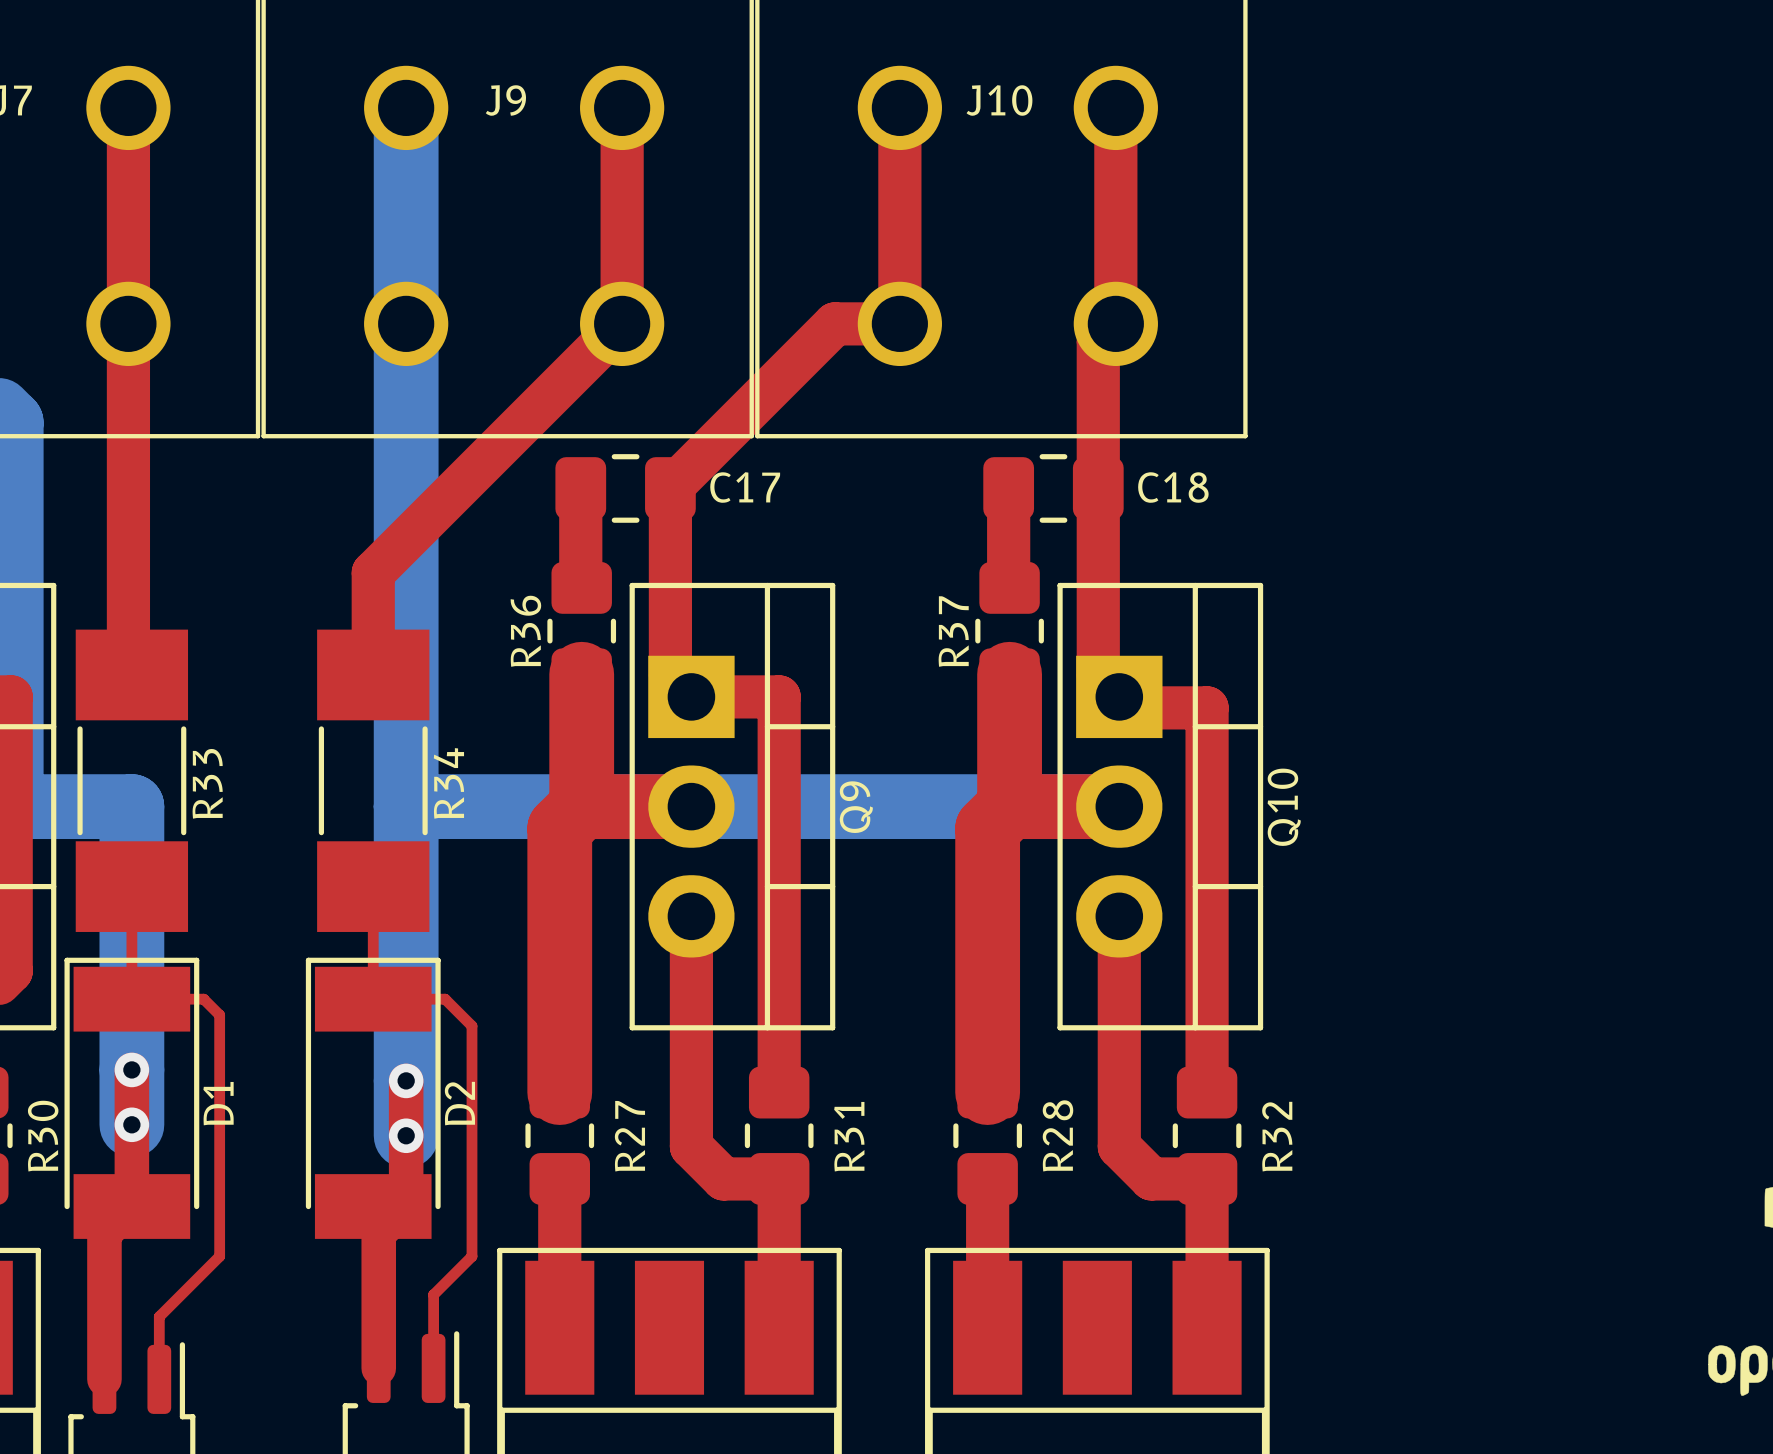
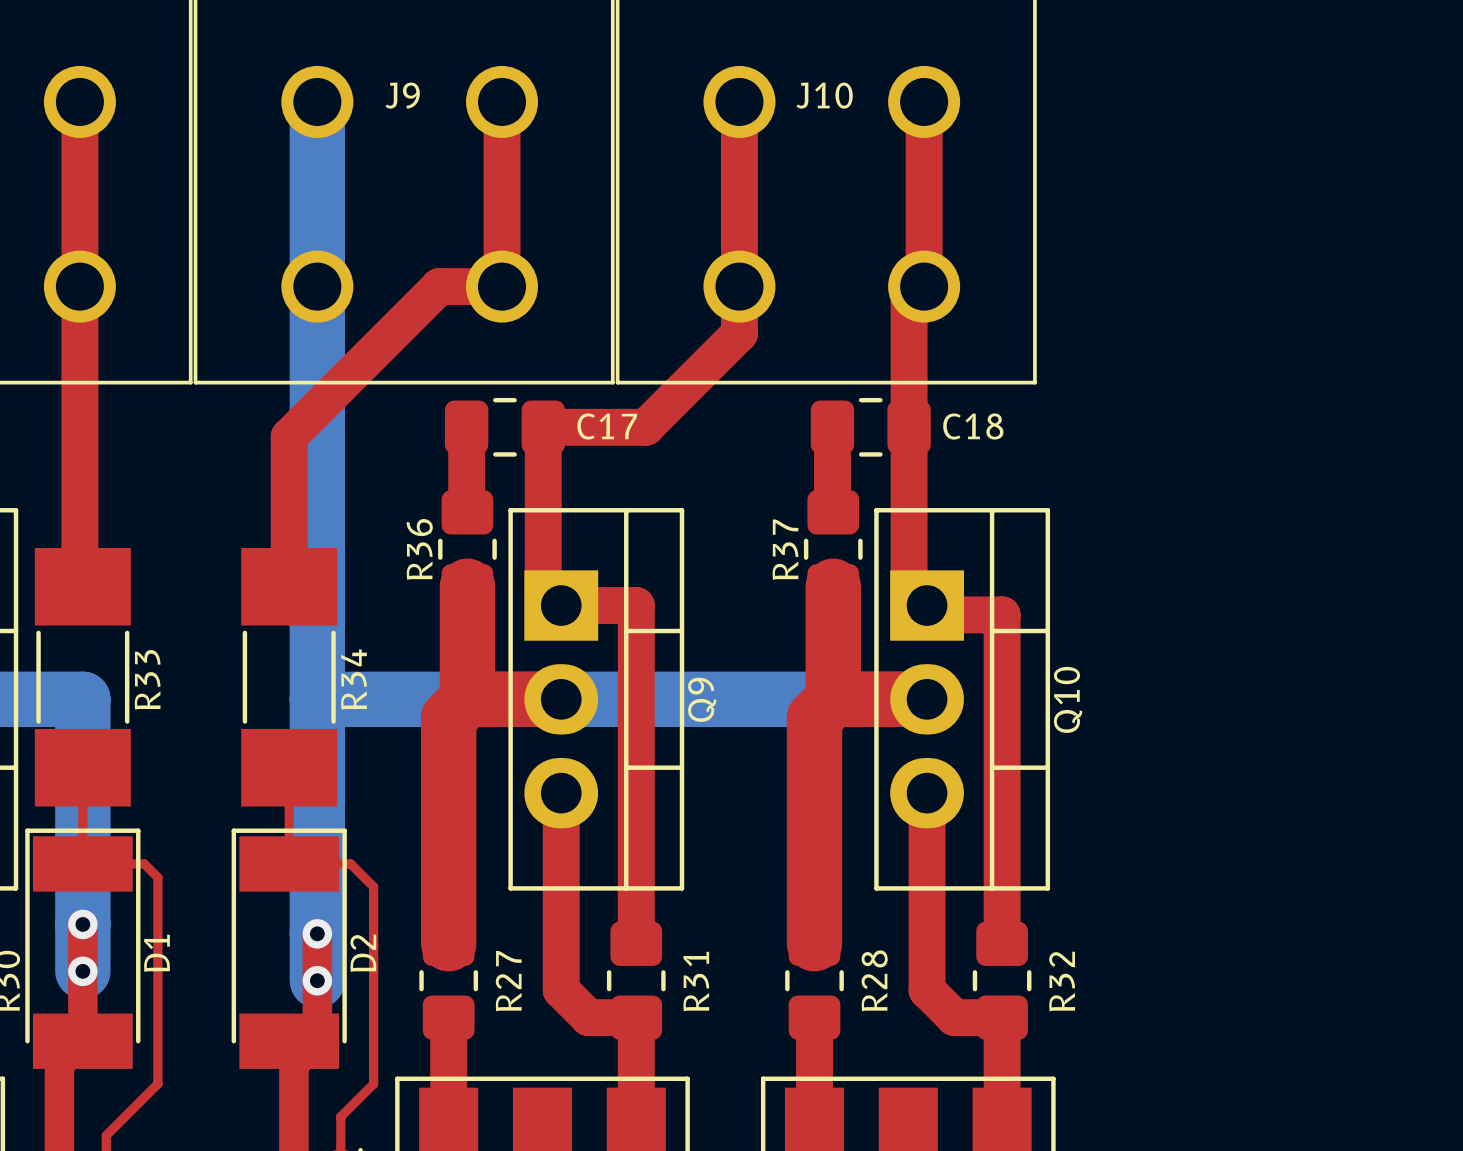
top track: (622, 323) (373, 572) -> (502, 286) (439, 286) (289, 436) (289, 499)
top track: (899, 323) (834, 323) (670, 488) -> (739, 286) (739, 333) (645, 427) (543, 427)

